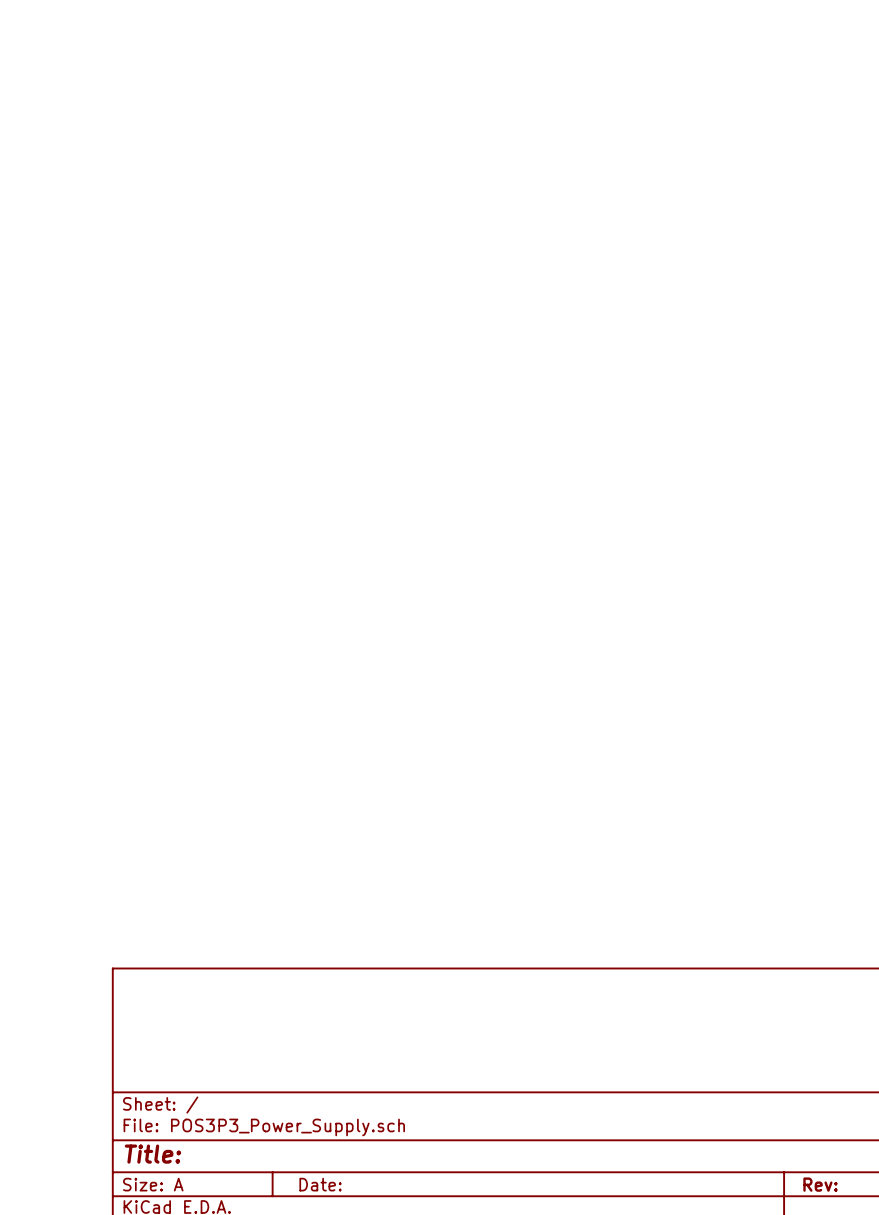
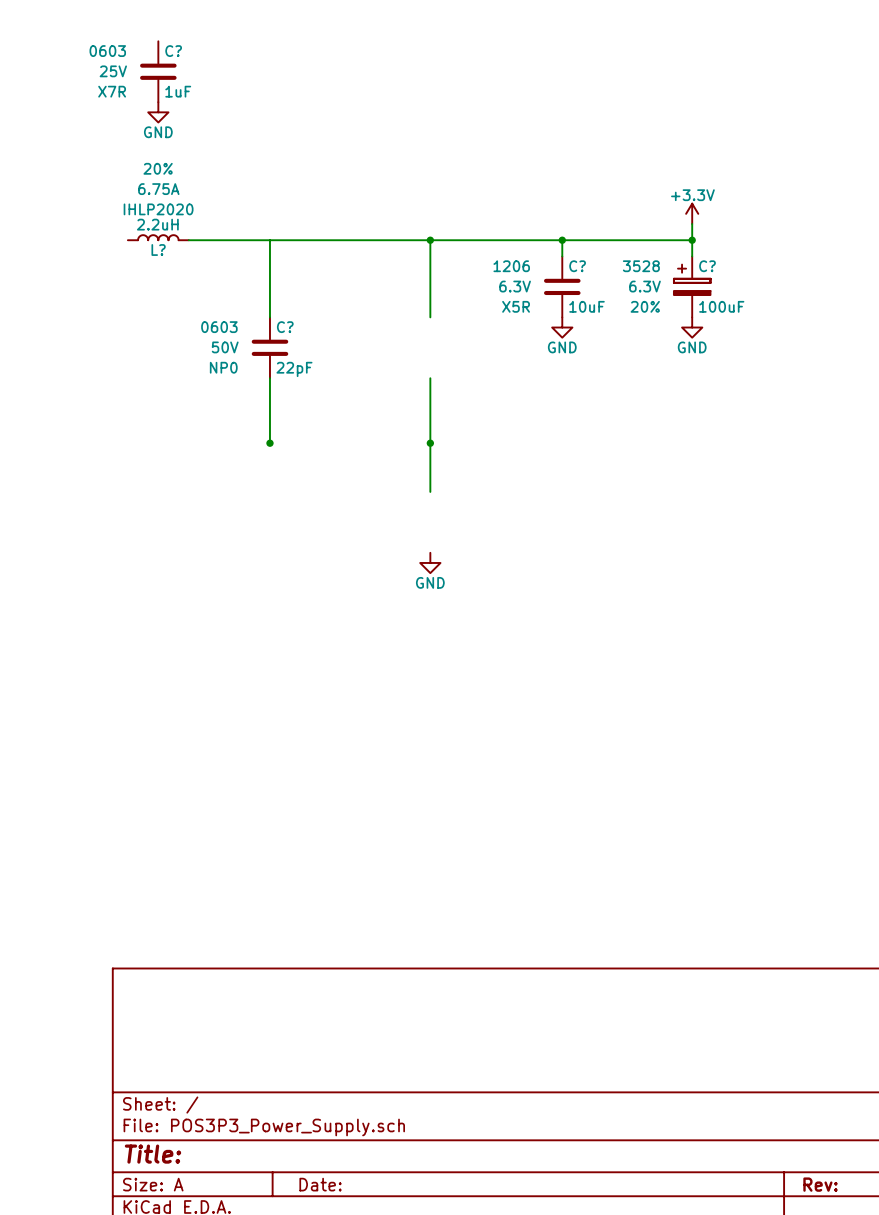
C?: none -> 1uF (158, 71)
power symbol: none -> GND (158, 112)
power symbol: none -> +3.3V (692, 213)
wire: none -> (692, 223) (692, 256)
L?: none -> 2.2uH (158, 237)
wire: none -> (188, 240) (692, 240)
wire: none -> (269, 240) (269, 317)
wire: none -> (430, 240) (430, 317)
junction: none -> (430, 240)
wire: none -> (562, 240) (562, 256)
junction: none -> (562, 240)
junction: none -> (692, 240)
C?: none -> 10uF (562, 286)
C?: none -> 100uF (692, 286)
power symbol: none -> GND (562, 327)
power symbol: none -> GND (692, 327)
C?: none -> 22pF (269, 347)
wire: none -> (269, 378) (269, 443)
wire: none -> (430, 378) (430, 491)
junction: none -> (269, 443)
junction: none -> (430, 443)
power symbol: none -> GND (430, 562)

